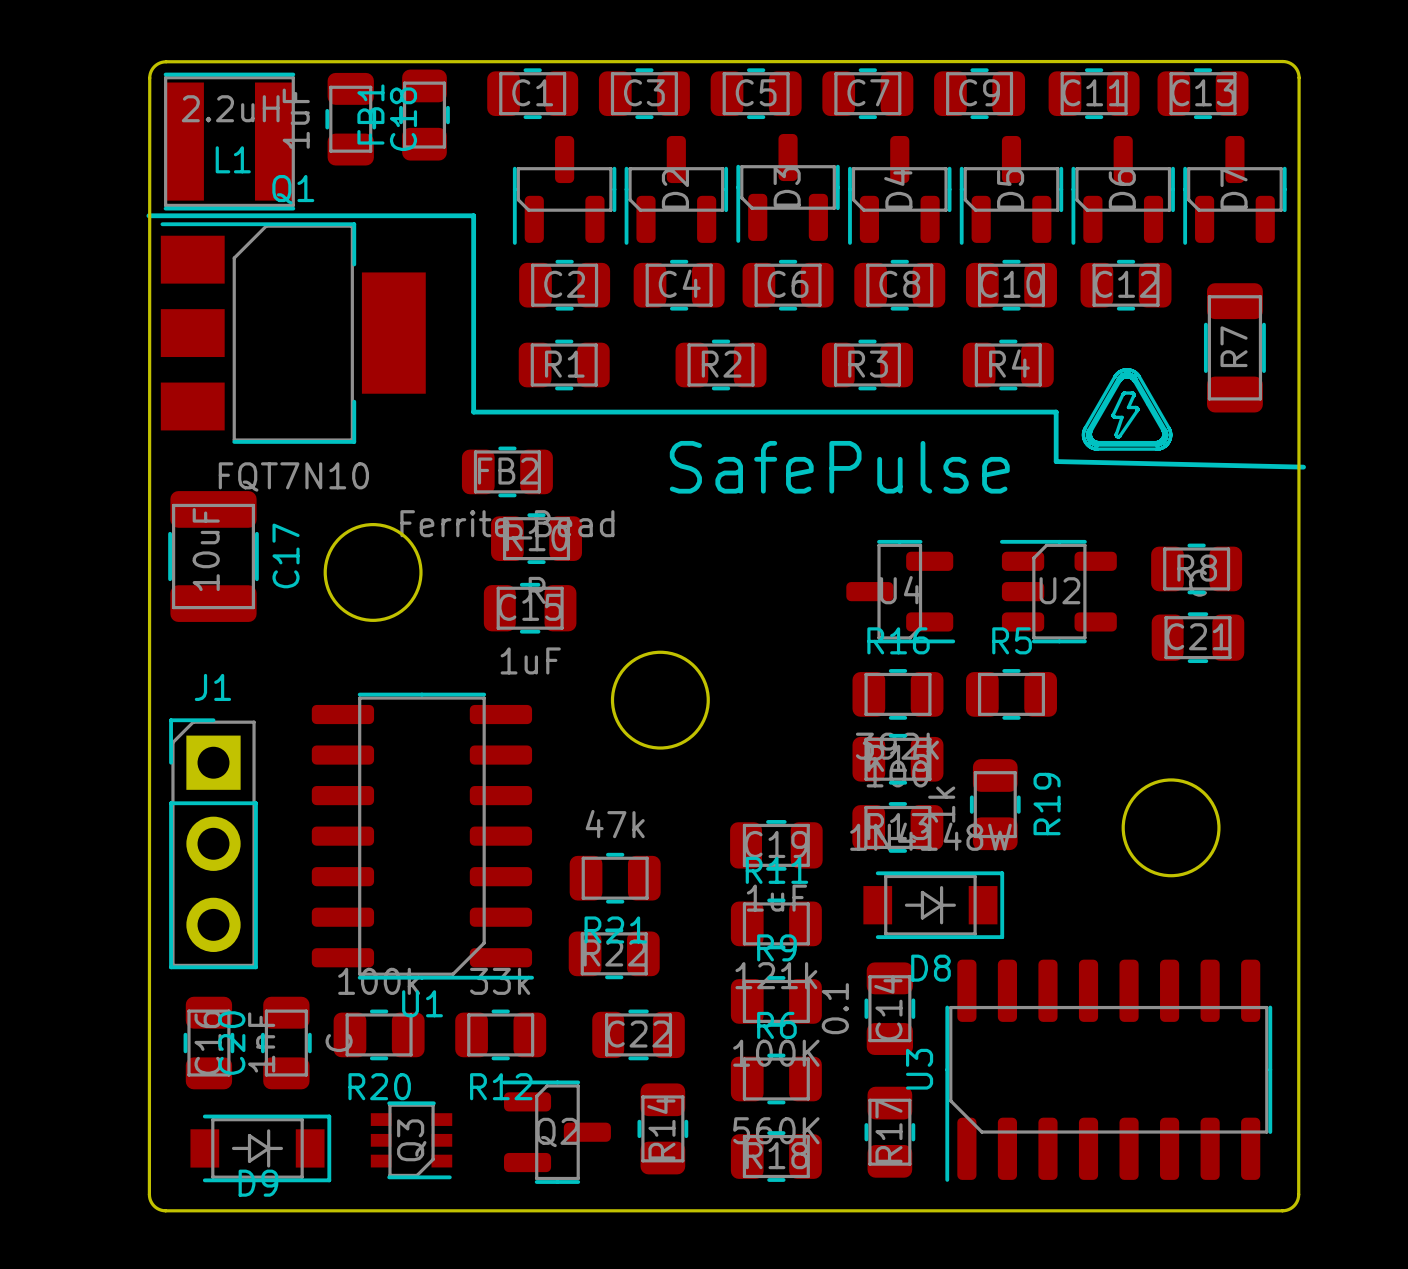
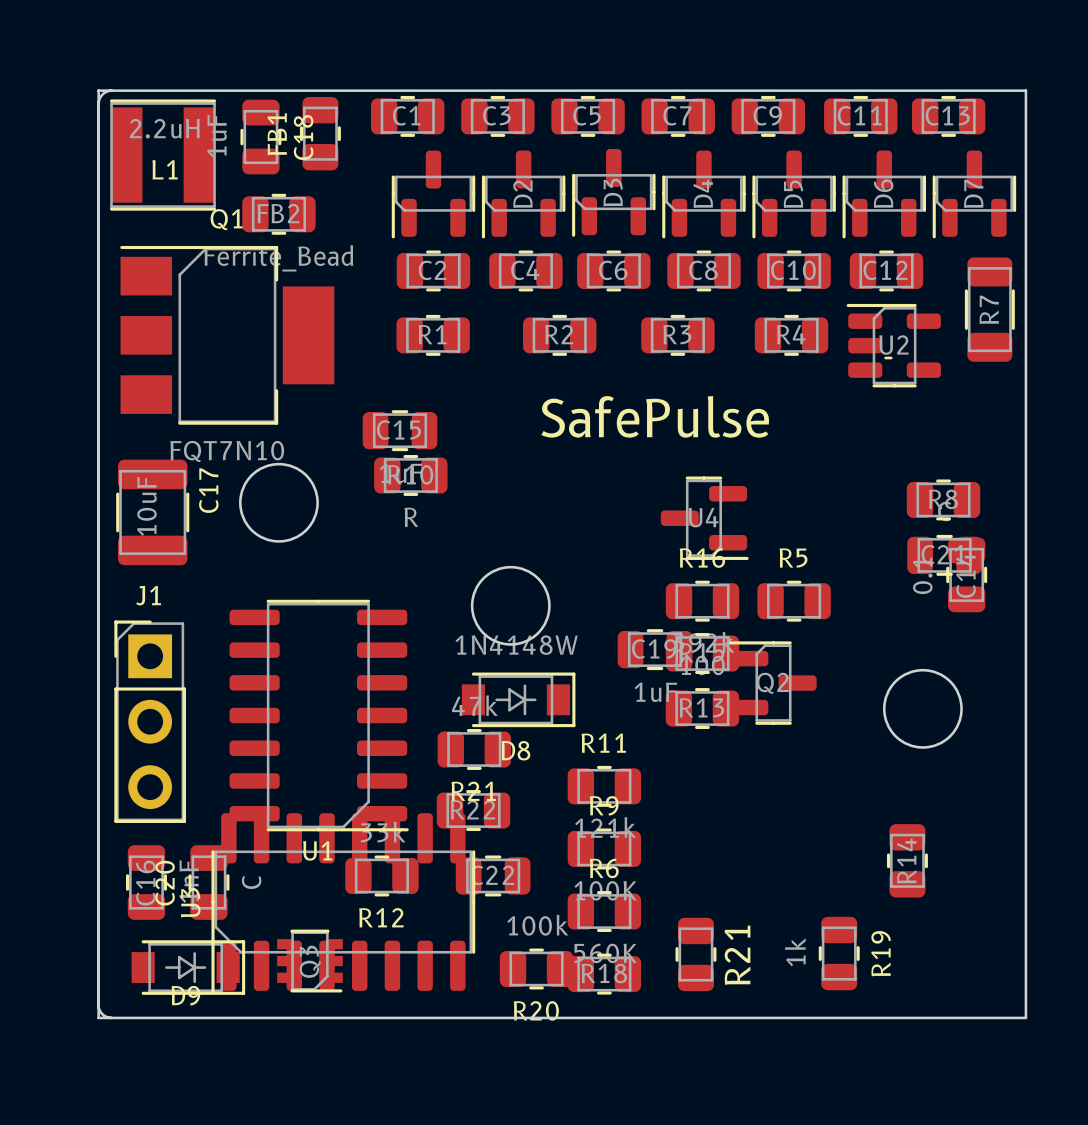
board edge: (166, 61) (1282, 61) (1294, 66) (1299, 77) (1298, 1194) (1293, 1206) (1282, 1210) -> (111, 1017) (98, 1017) (98, 90) (1025, 90) (1025, 1017) (1012, 1017)
line: (148, 215) (473, 215) (473, 412) (1056, 412) (1056, 461) (1303, 467) -> none
Q1 position: (293, 333) -> (227, 335)
R7 position: (1234, 347) -> (989, 309)
line: (1127, 369) (1138, 375) (1168, 427) (1170, 434) (1168, 442) -> none
line: (1127, 373) (1118, 378) (1088, 430) (1088, 440) -> none
line: (1114, 376) (1084, 429) (1085, 442) (1095, 449) (1156, 449) -> none
line: (1135, 378) (1165, 430) (1165, 440) (1157, 445) (1097, 445) -> none
line: (1119, 380) (1091, 430) -> none
line: (1134, 380) (1162, 430) -> none
line: (1123, 394) (1113, 414) -> none
line: (1133, 395) (1128, 407) (1135, 407) -> none
line: (1137, 410) (1120, 435) -> none
line: (1115, 417) (1122, 417) (1116, 434) -> none
line: (1098, 442) (1155, 442) -> none
FB2 position: (507, 471) -> (278, 214)
C17 position: (213, 556) -> (152, 512)
U2 position: (1058, 591) -> (893, 345)
C15 position: (530, 608) -> (400, 430)
R19 position: (995, 804) -> (839, 953)
C19 position: (776, 845) -> (655, 649)
D8 position: (933, 905) -> (518, 699)
C14 position: (889, 1008) -> (966, 574)
R20 position: (379, 1034) -> (536, 969)
U3 position: (1108, 1070) -> (343, 902)
R14 position: (662, 1128) -> (907, 860)
R17 name: R17 (888, 1131) -> R21 (737, 955)
Q2 position: (556, 1132) -> (772, 683)

